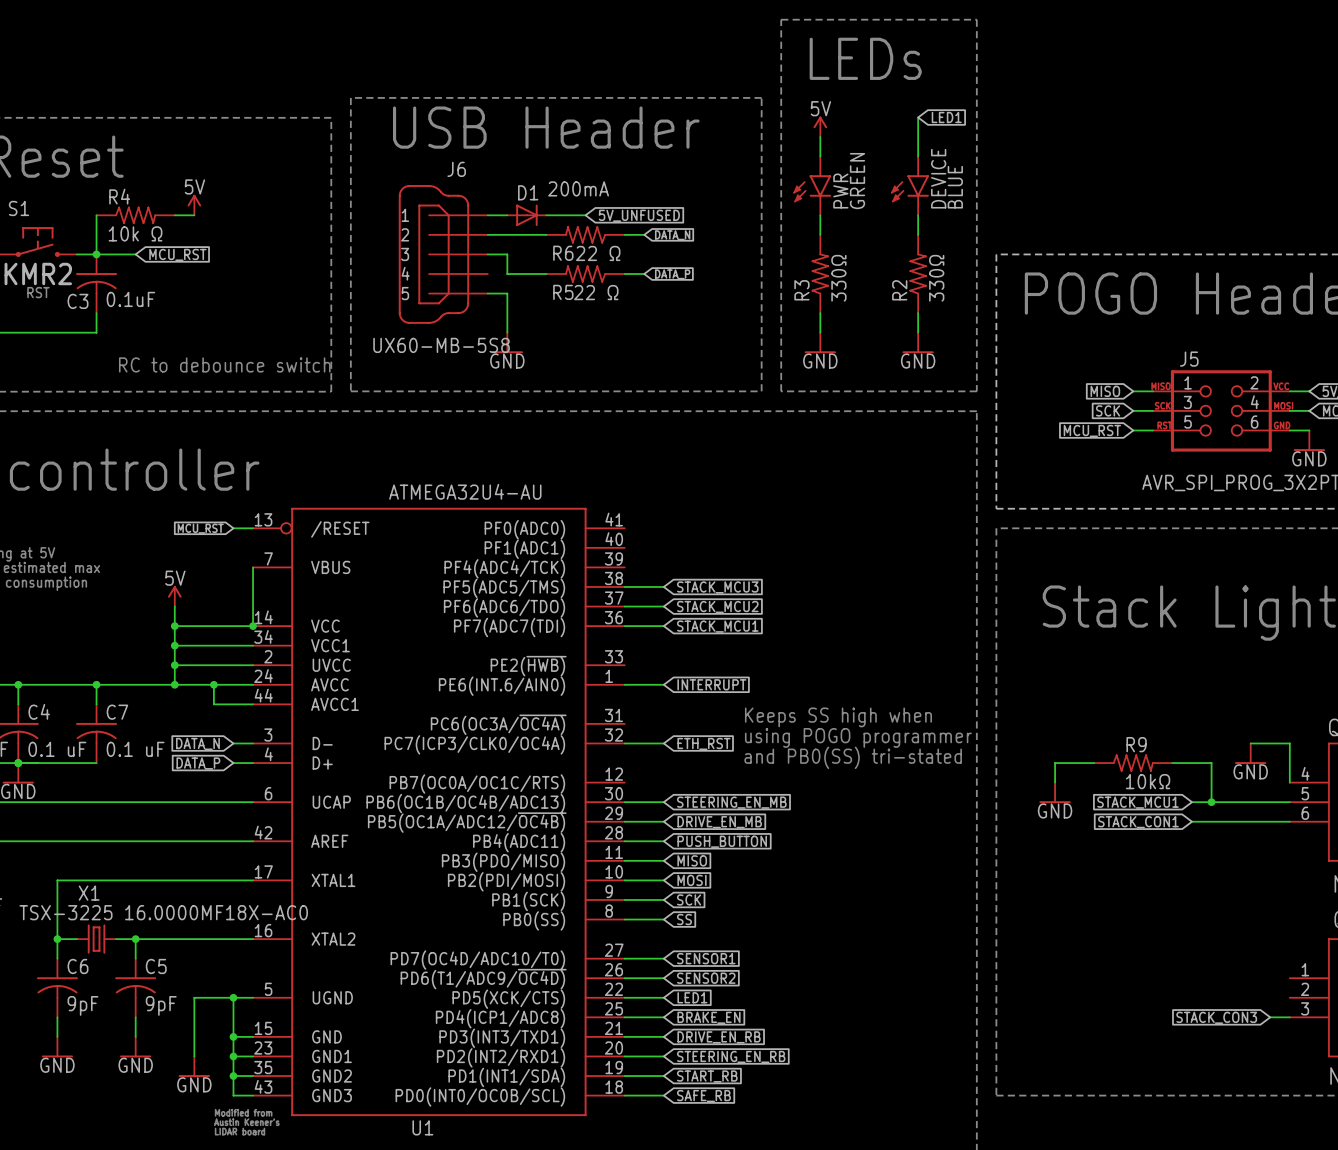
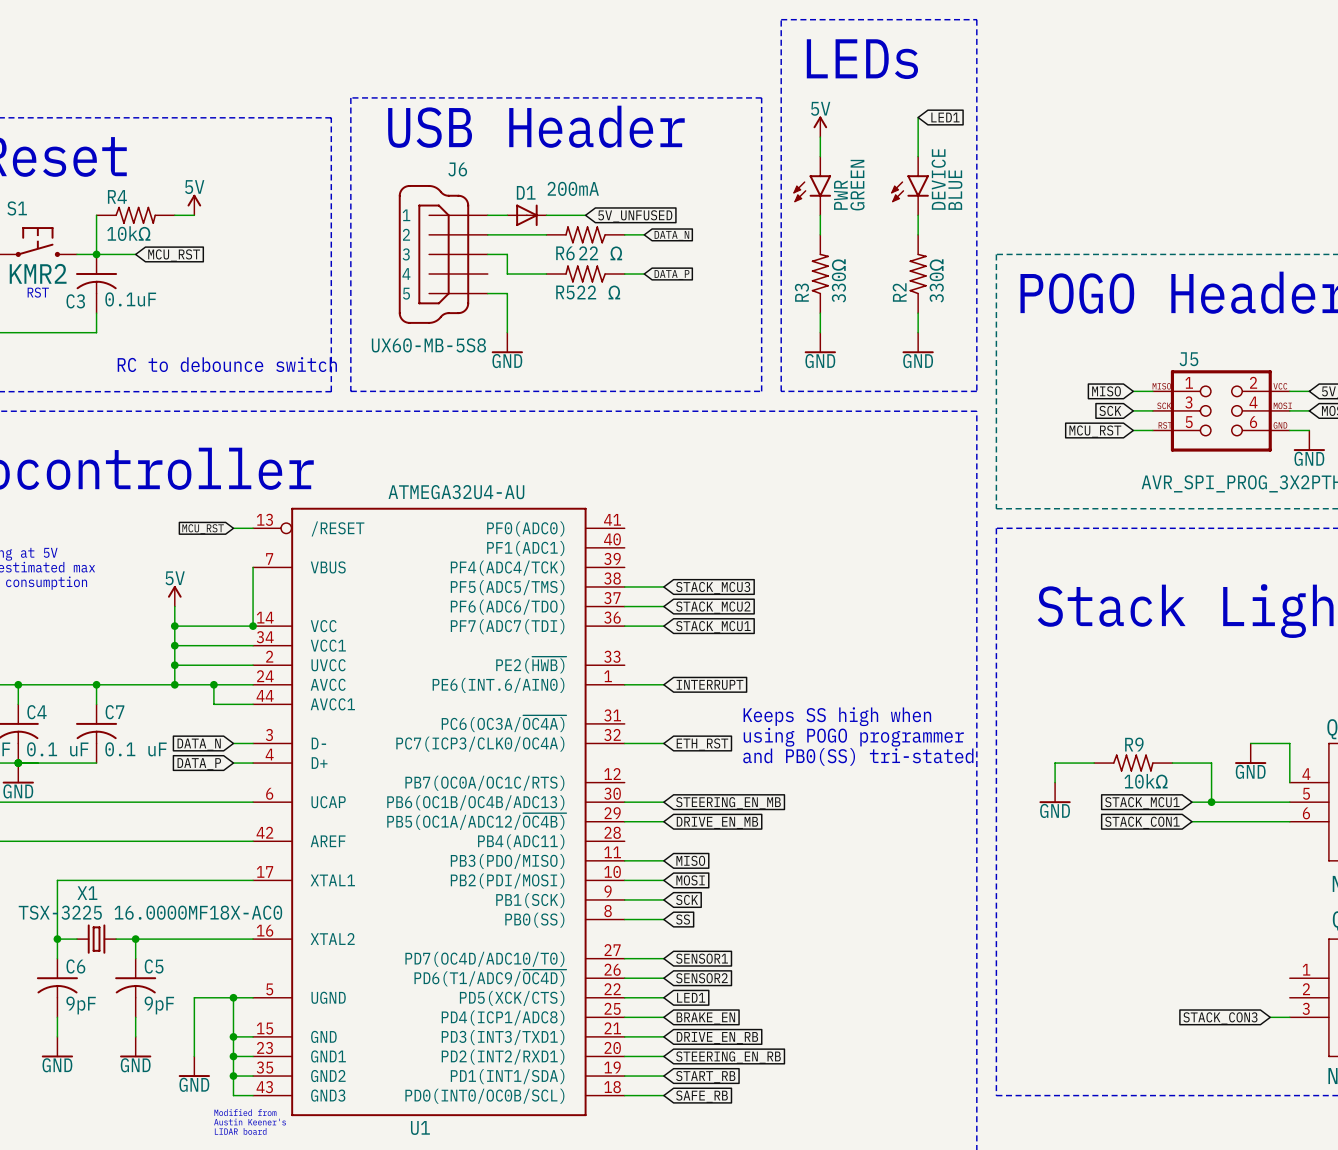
R4 value: 10k Ω (135, 233) -> 10kΩ (128, 233)
wire: (624, 841) (663, 841) -> none
global label: PUSH_BUTTON (722, 841) -> none

